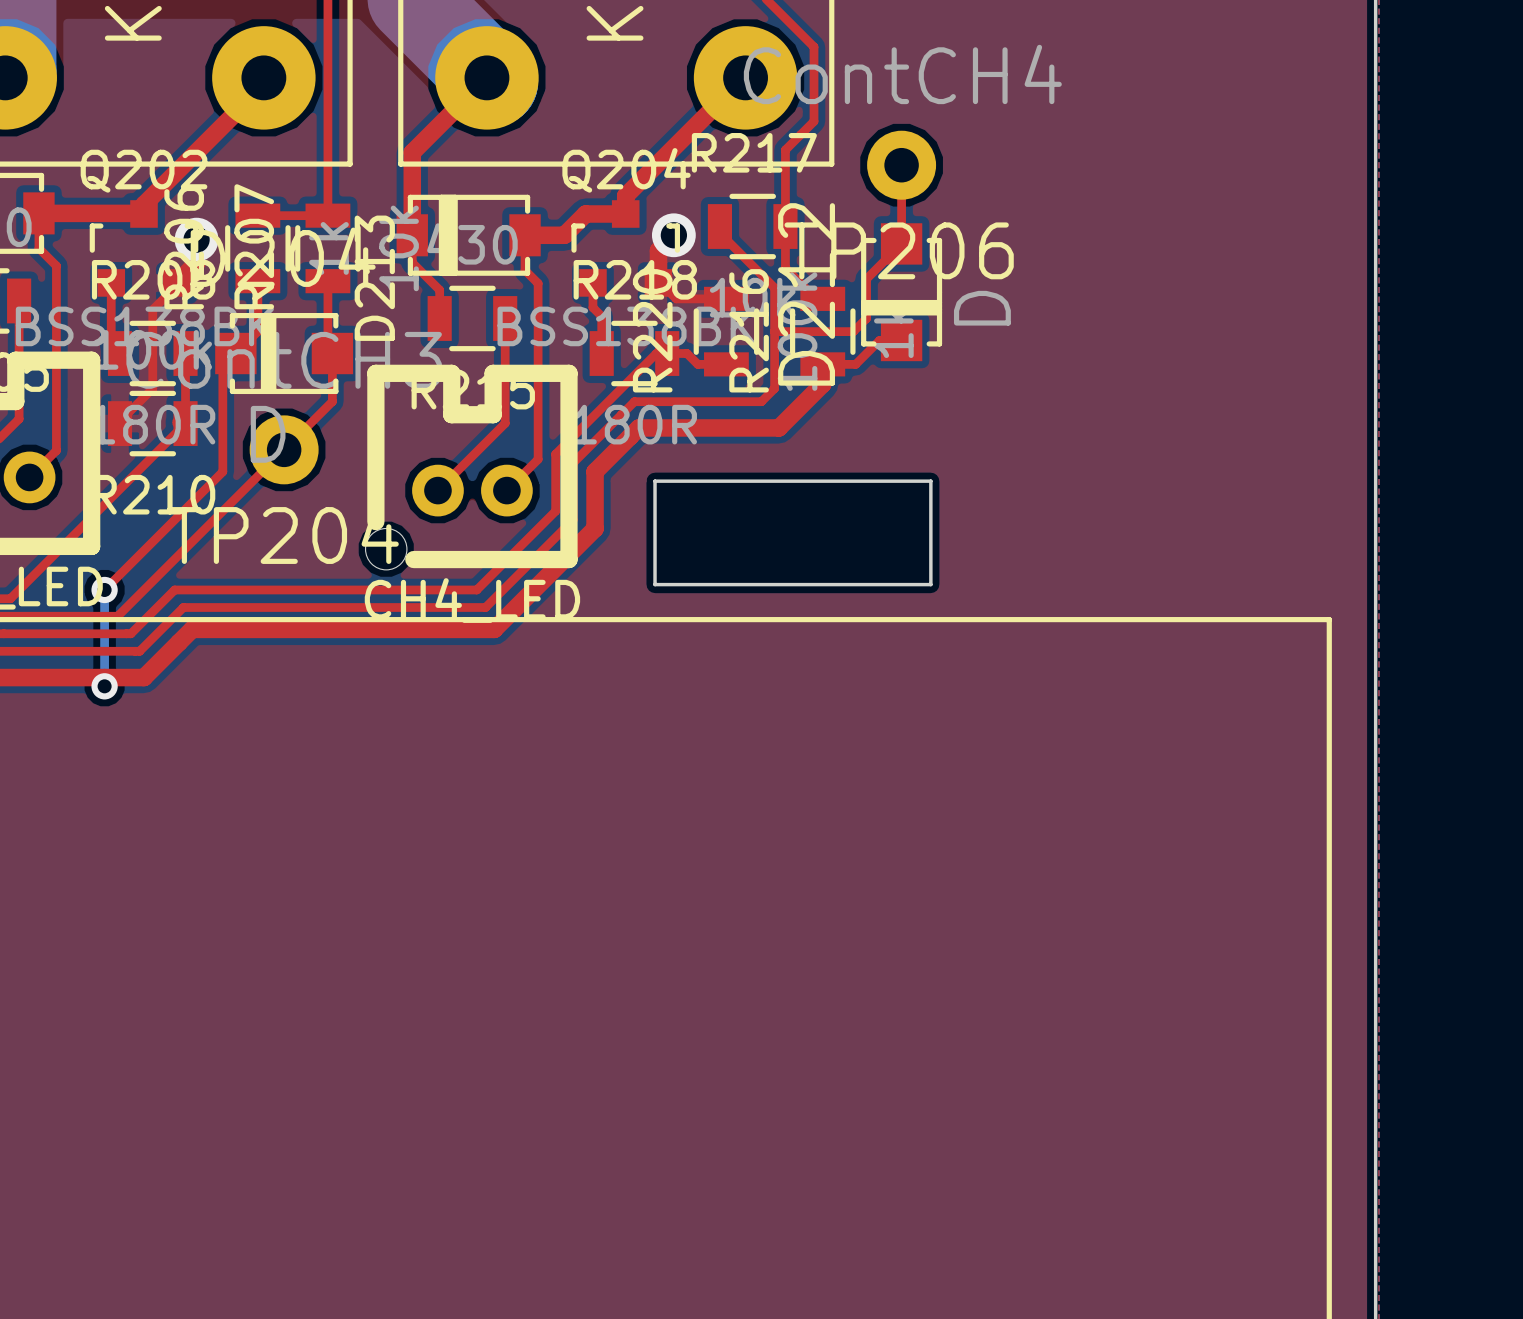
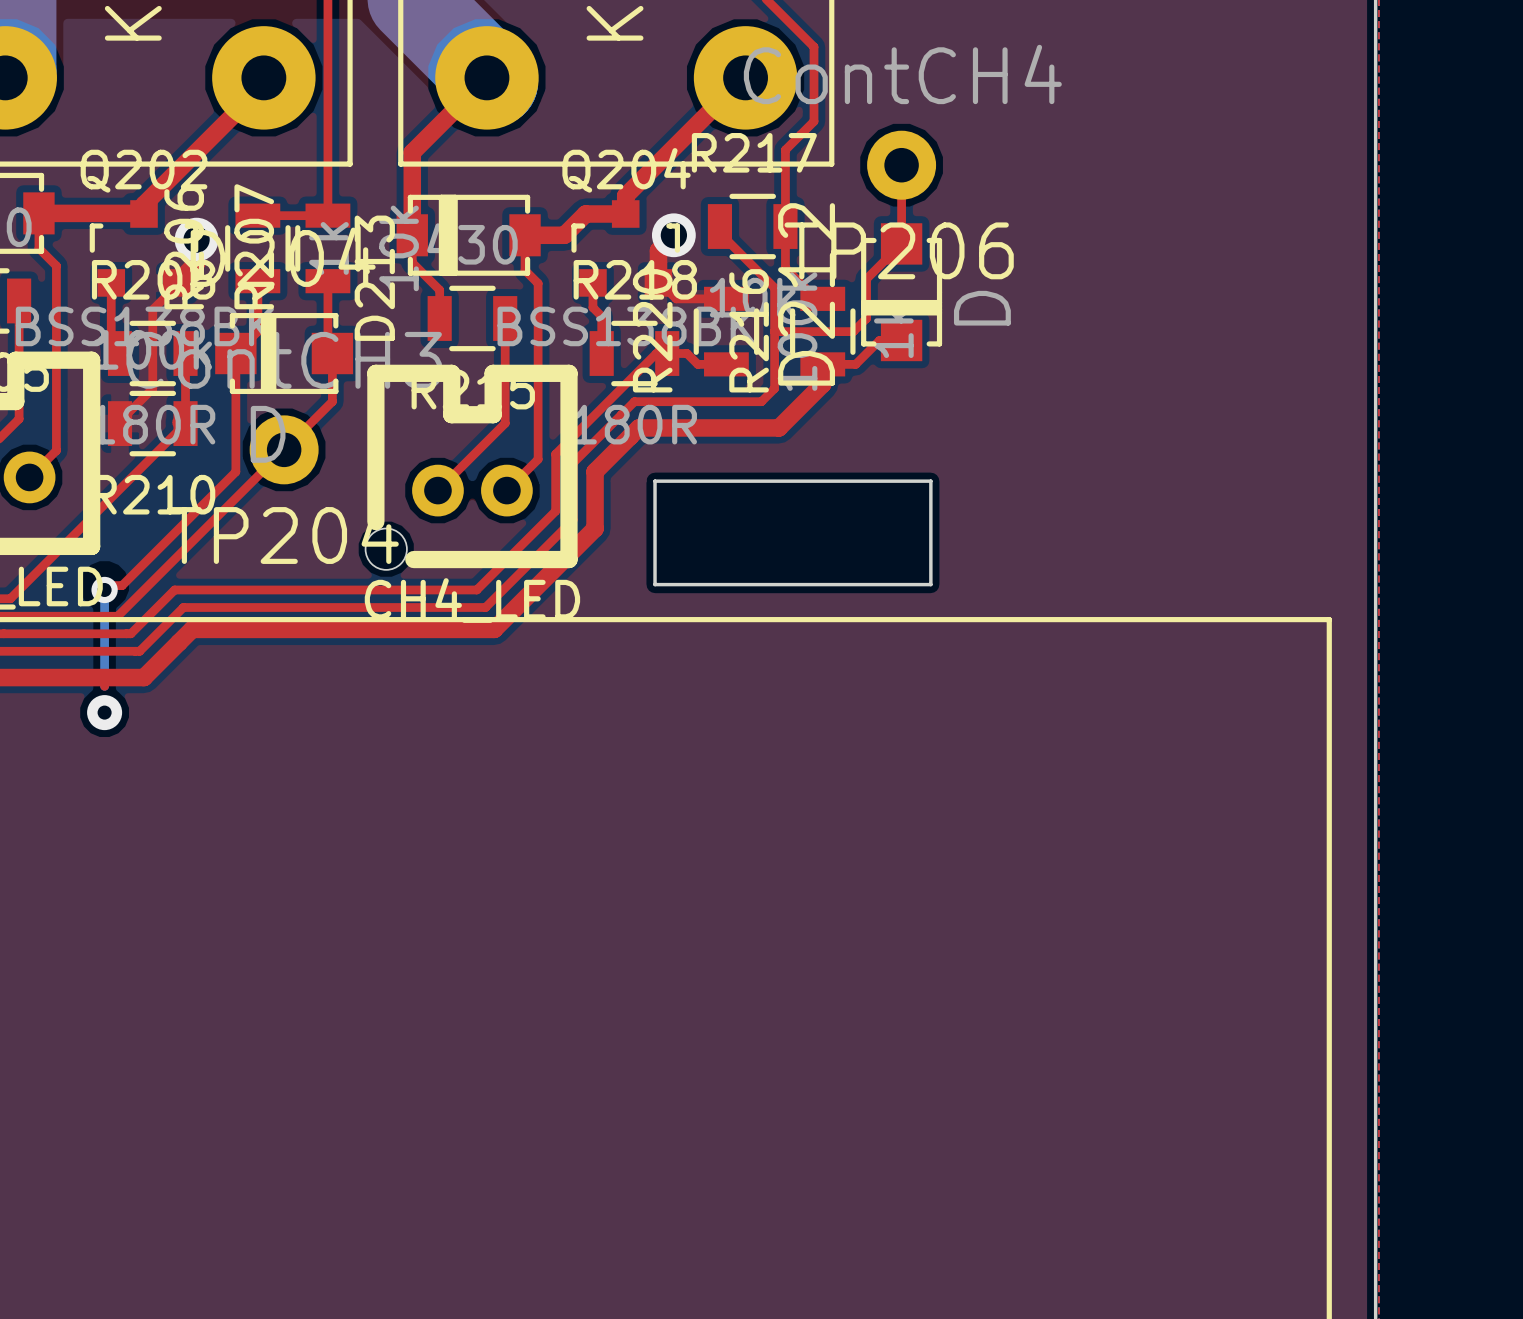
top track: none -> (235, 353) (235, 471) (122, 585) (104, 585)
top track: (222, 366) (222, 471) (104, 589) -> none
via position: (104, 686) -> (104, 712)

